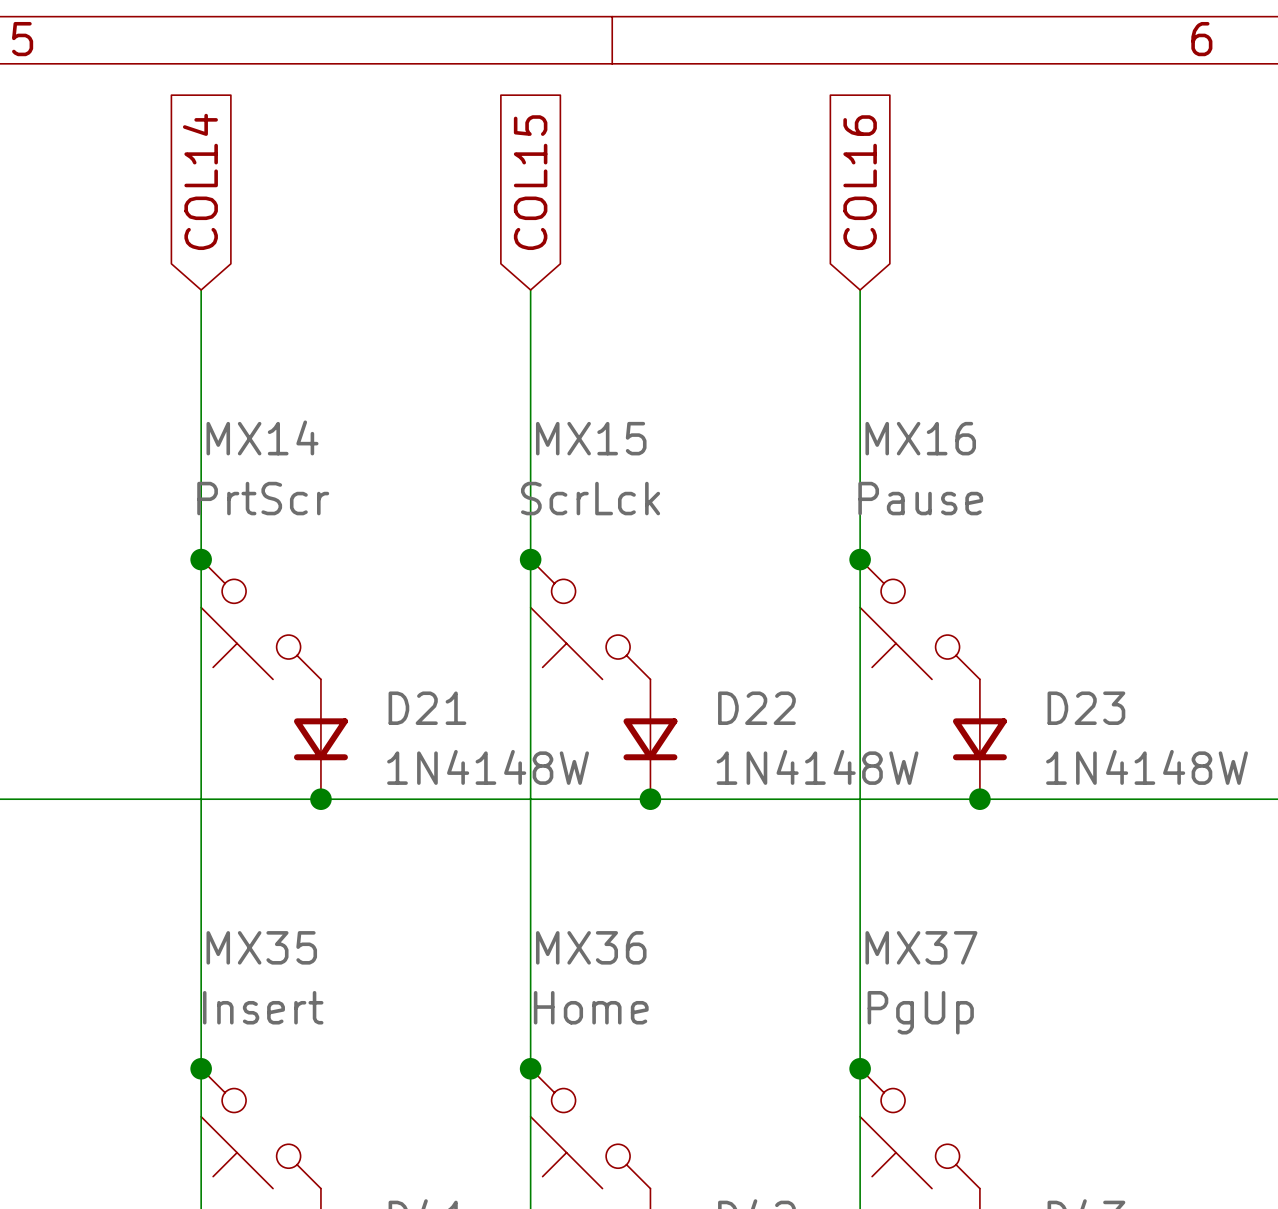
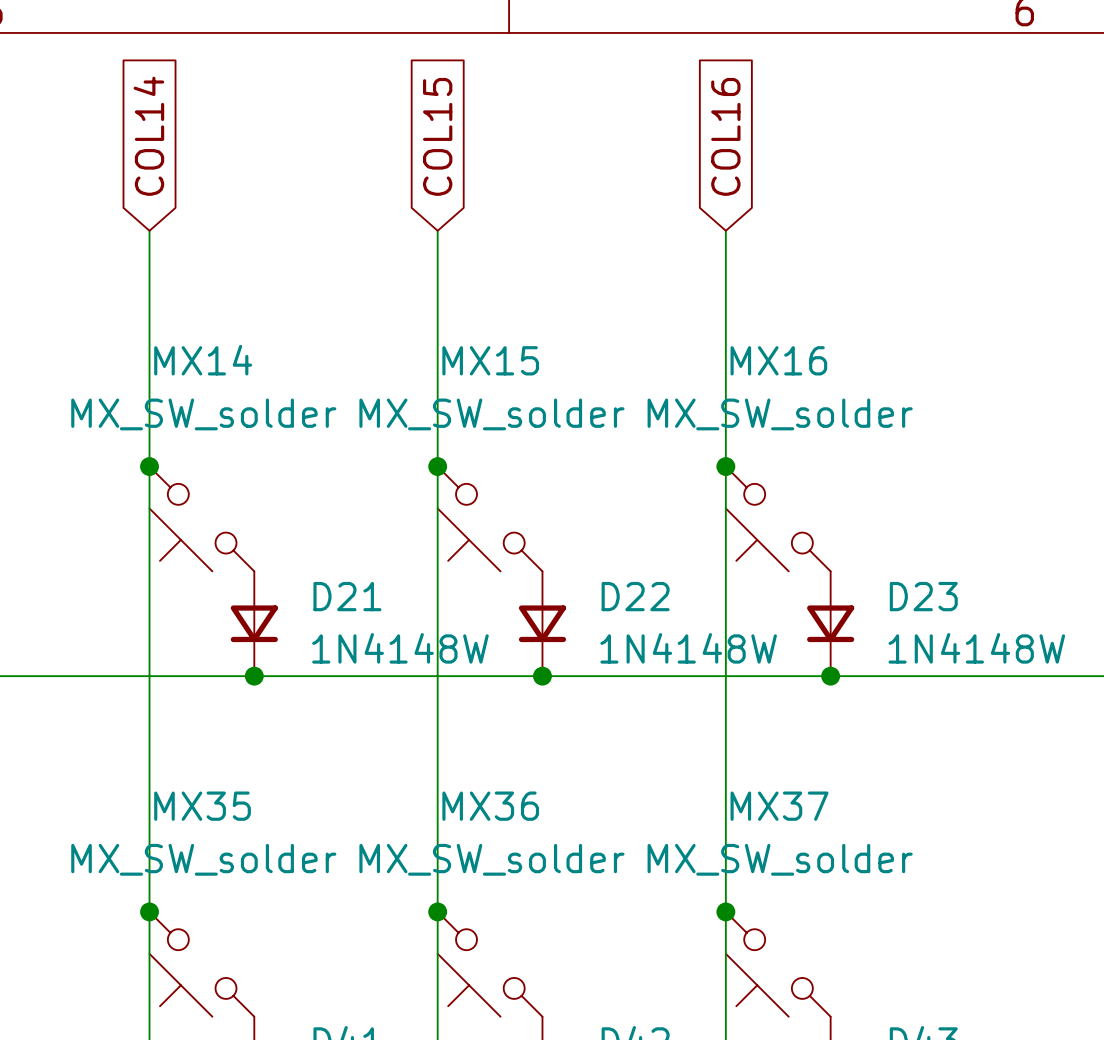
MX14 value: PrtScr (263, 498) -> MX_SW_solder (203, 414)
MX15 value: ScrLck (590, 498) -> MX_SW_solder (491, 414)
MX16 value: Pause (920, 498) -> MX_SW_solder (780, 414)
MX35 value: Insert (263, 1007) -> MX_SW_solder (203, 859)
MX36 value: Home (591, 1007) -> MX_SW_solder (491, 859)
MX37 value: PgUp (920, 1012) -> MX_SW_solder (780, 859)

